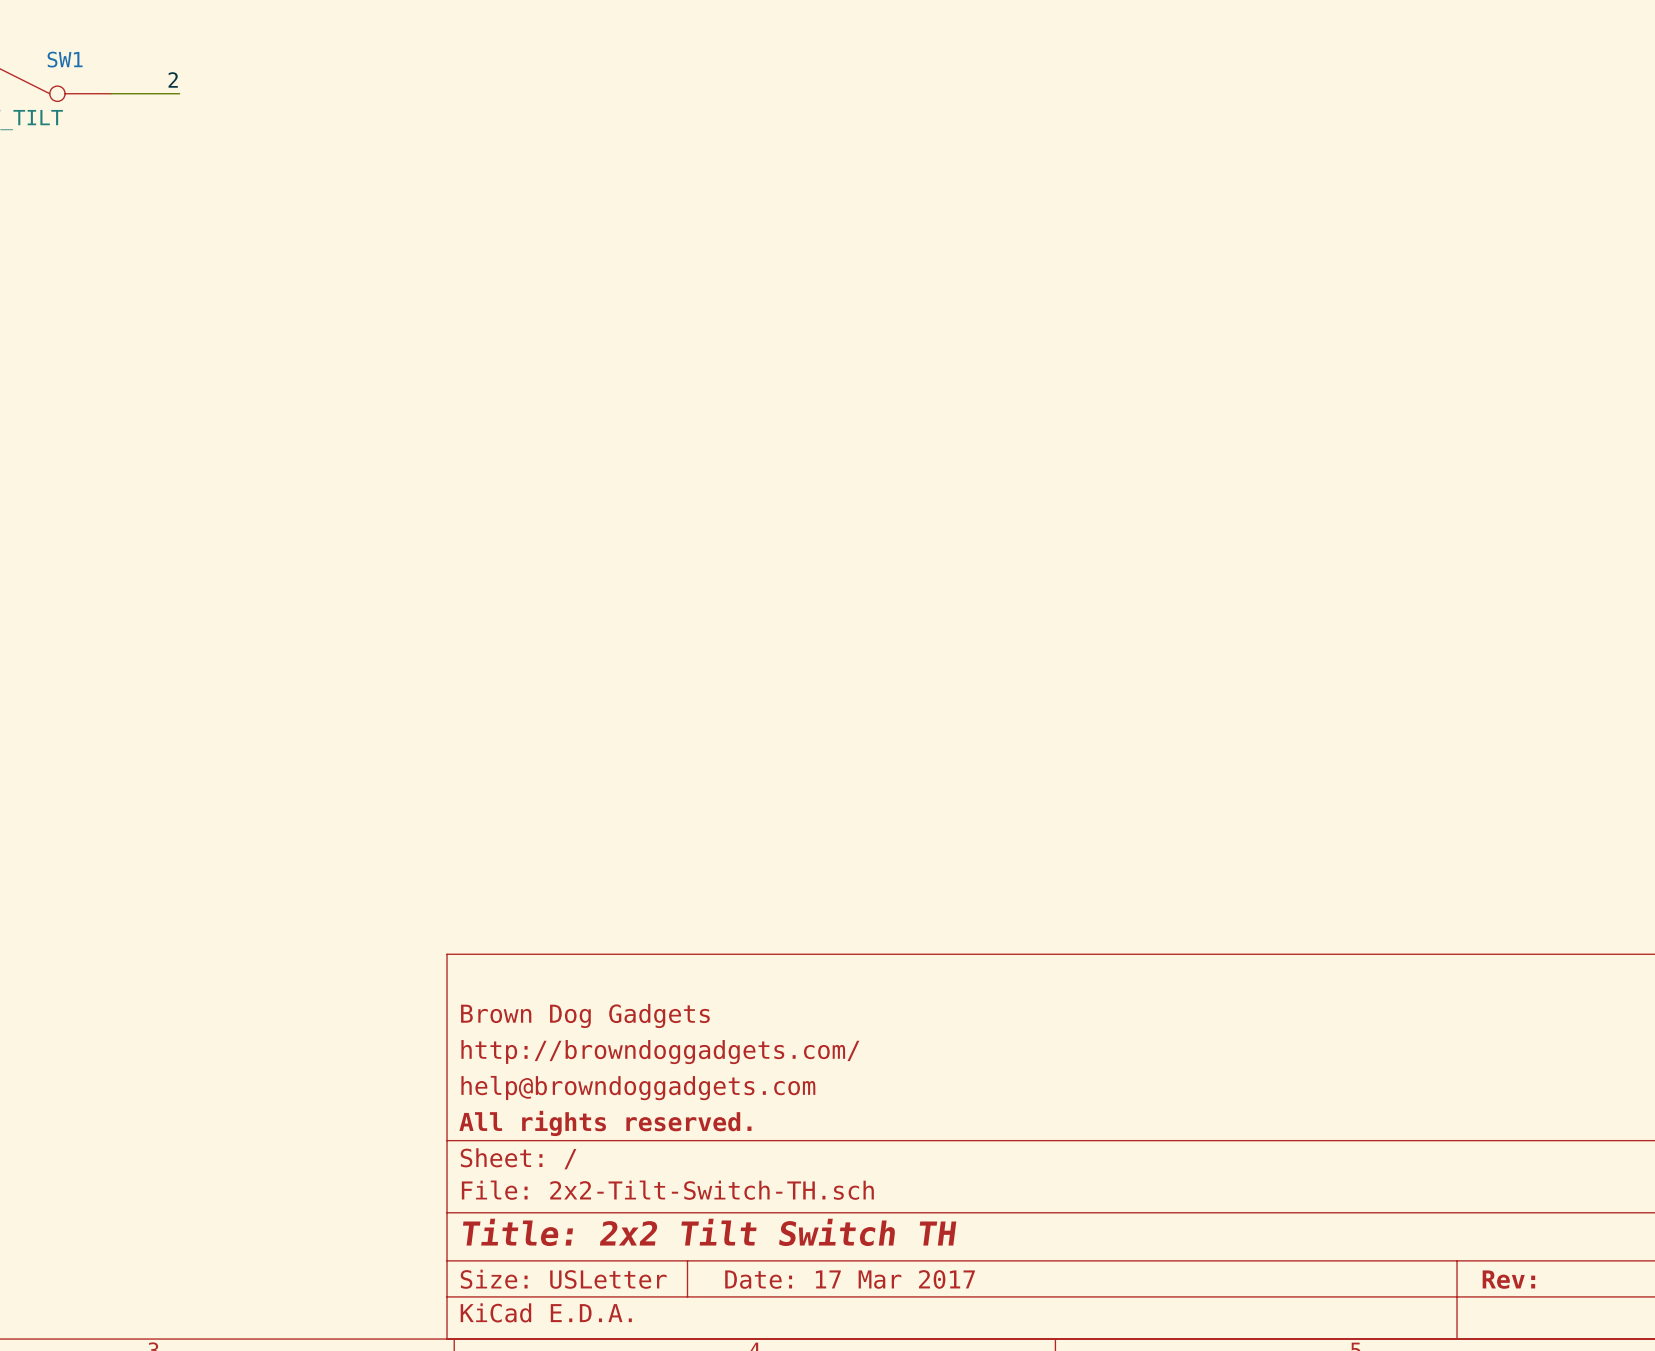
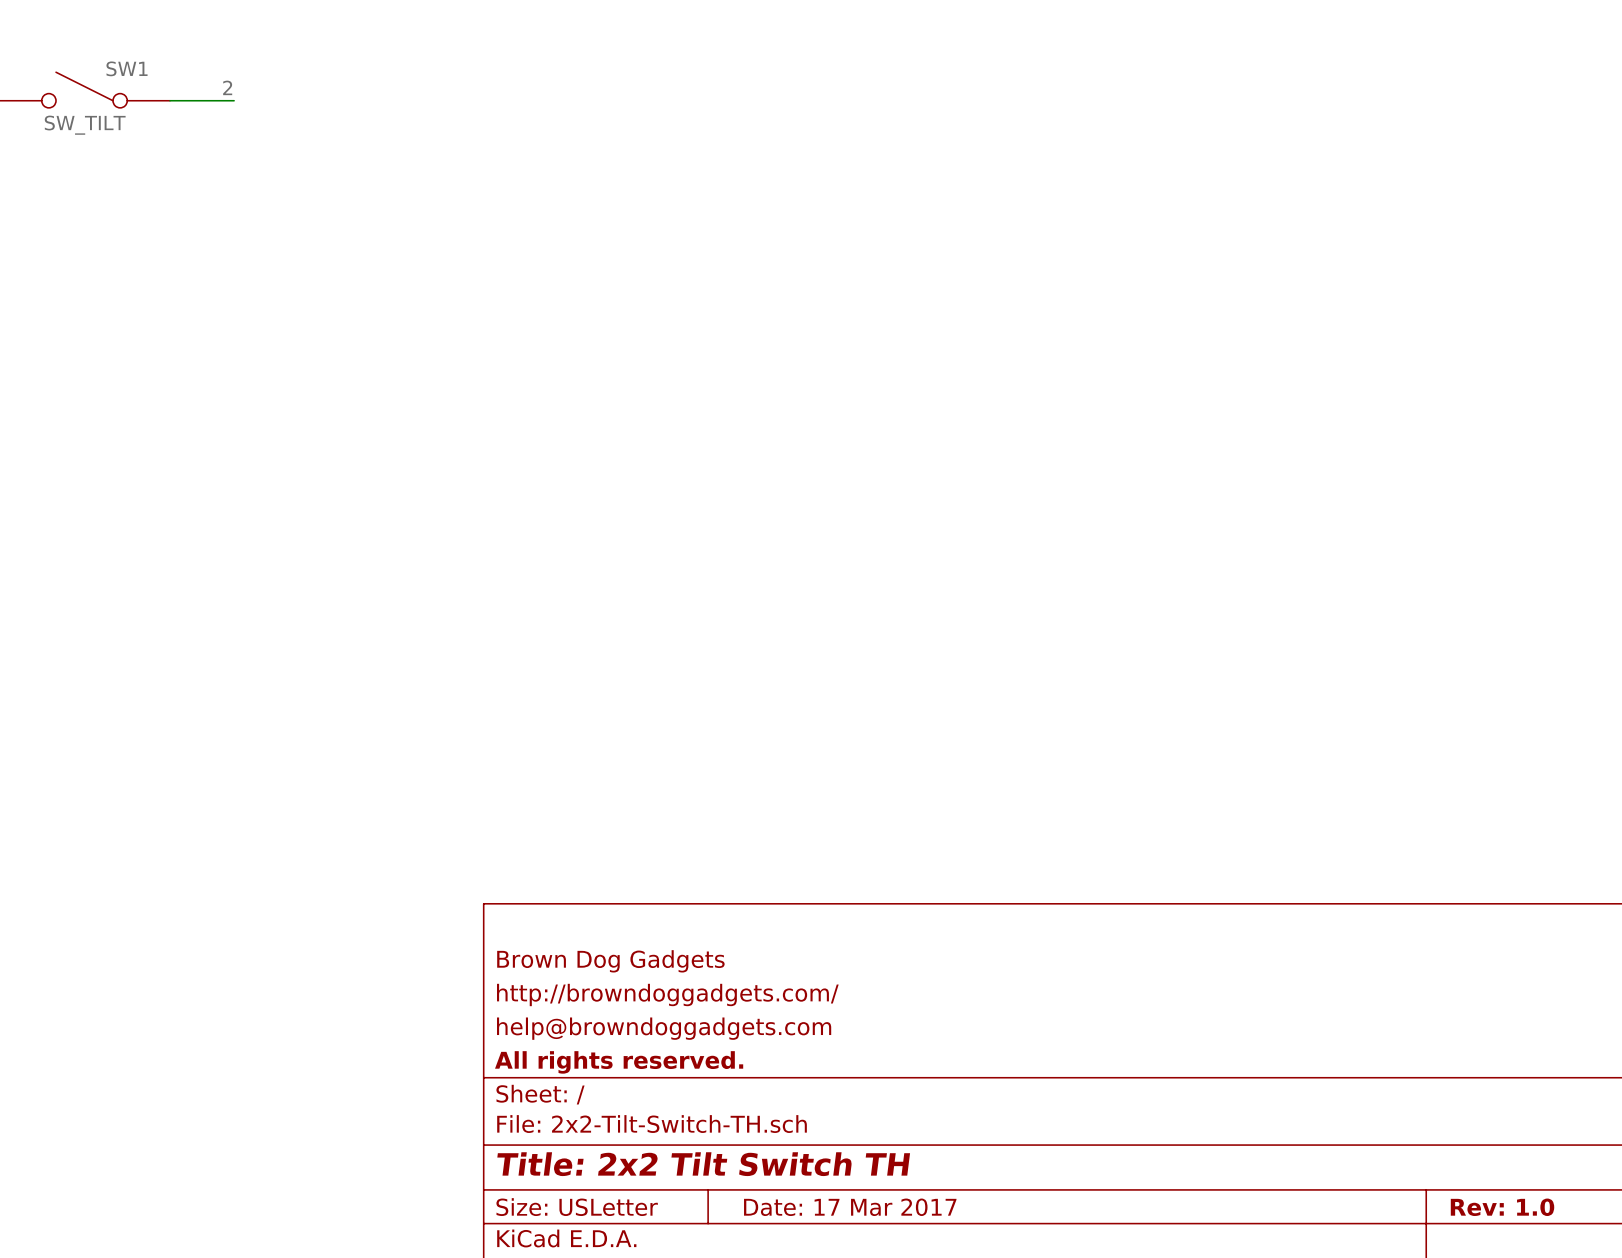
title block: Rev: (1508, 1279) -> Rev: 1.0 (1502, 1207)

